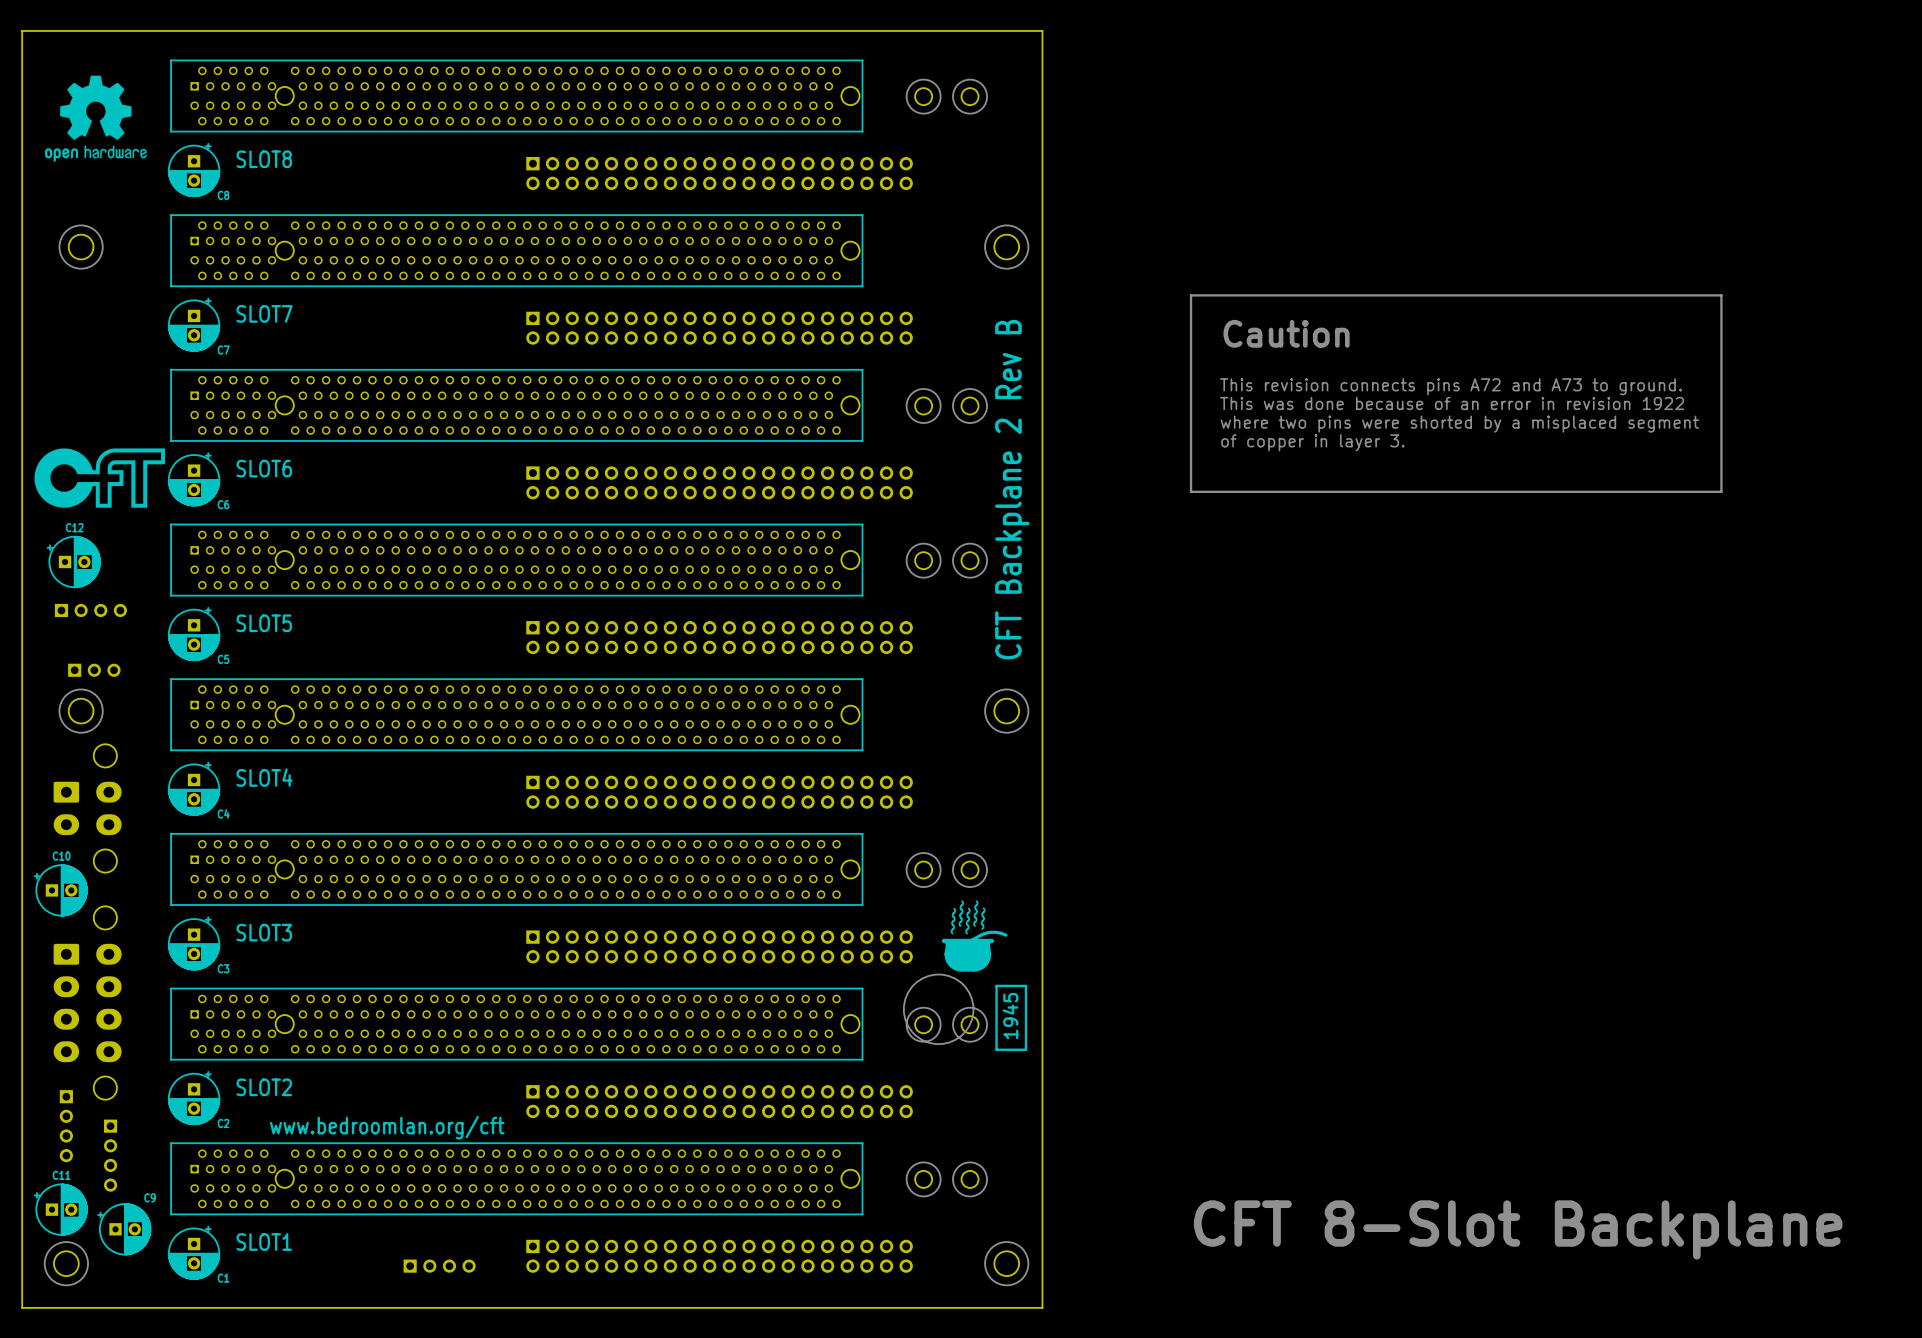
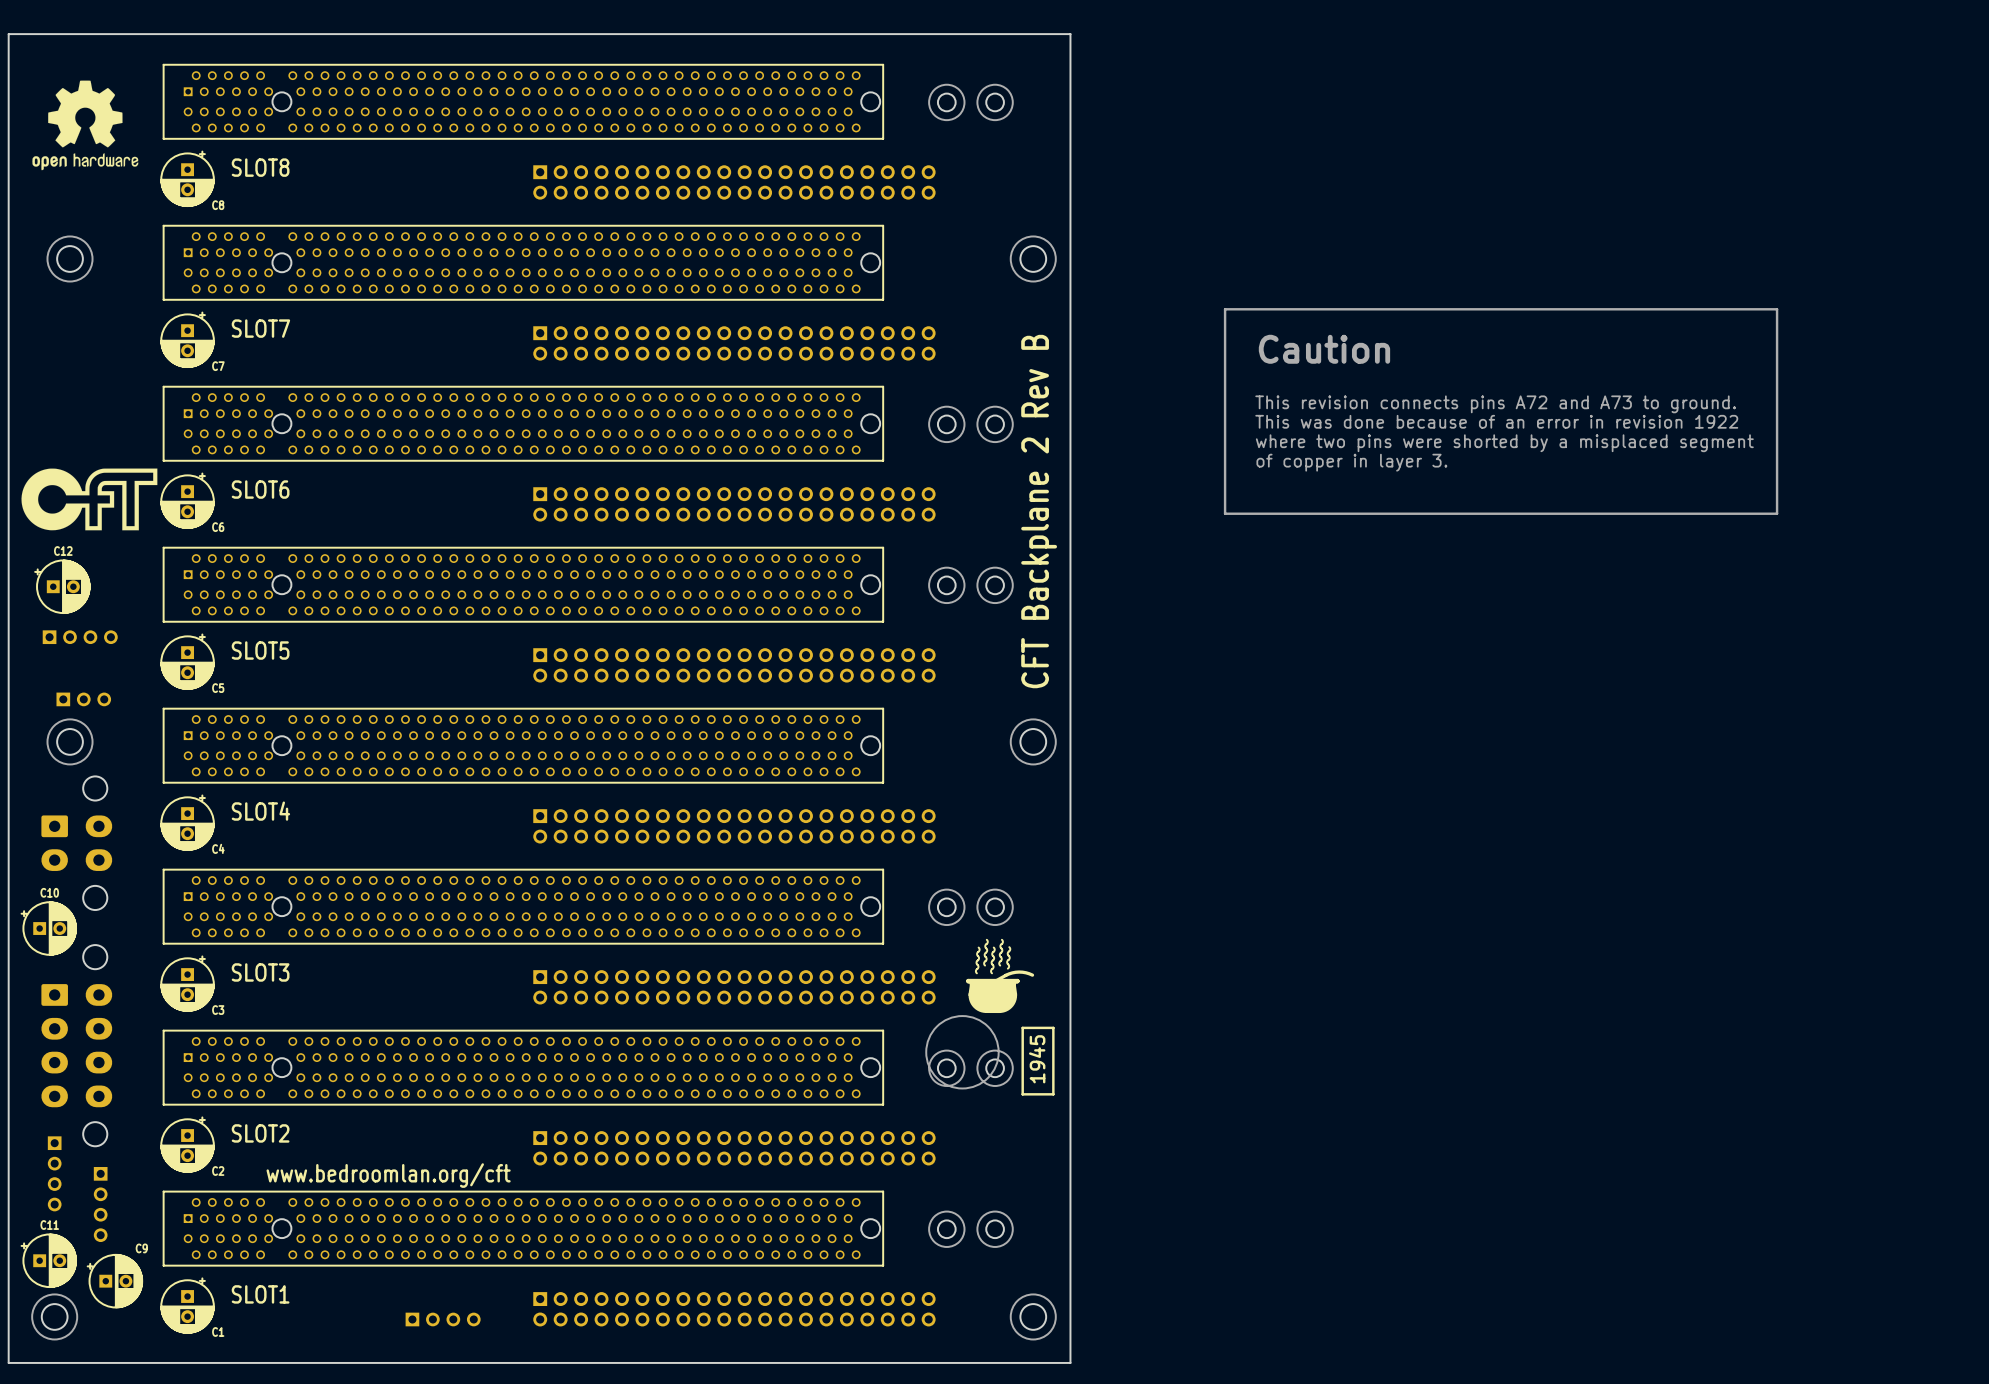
text: CFT 8-Slot Backplane (1518, 1229) -> none

